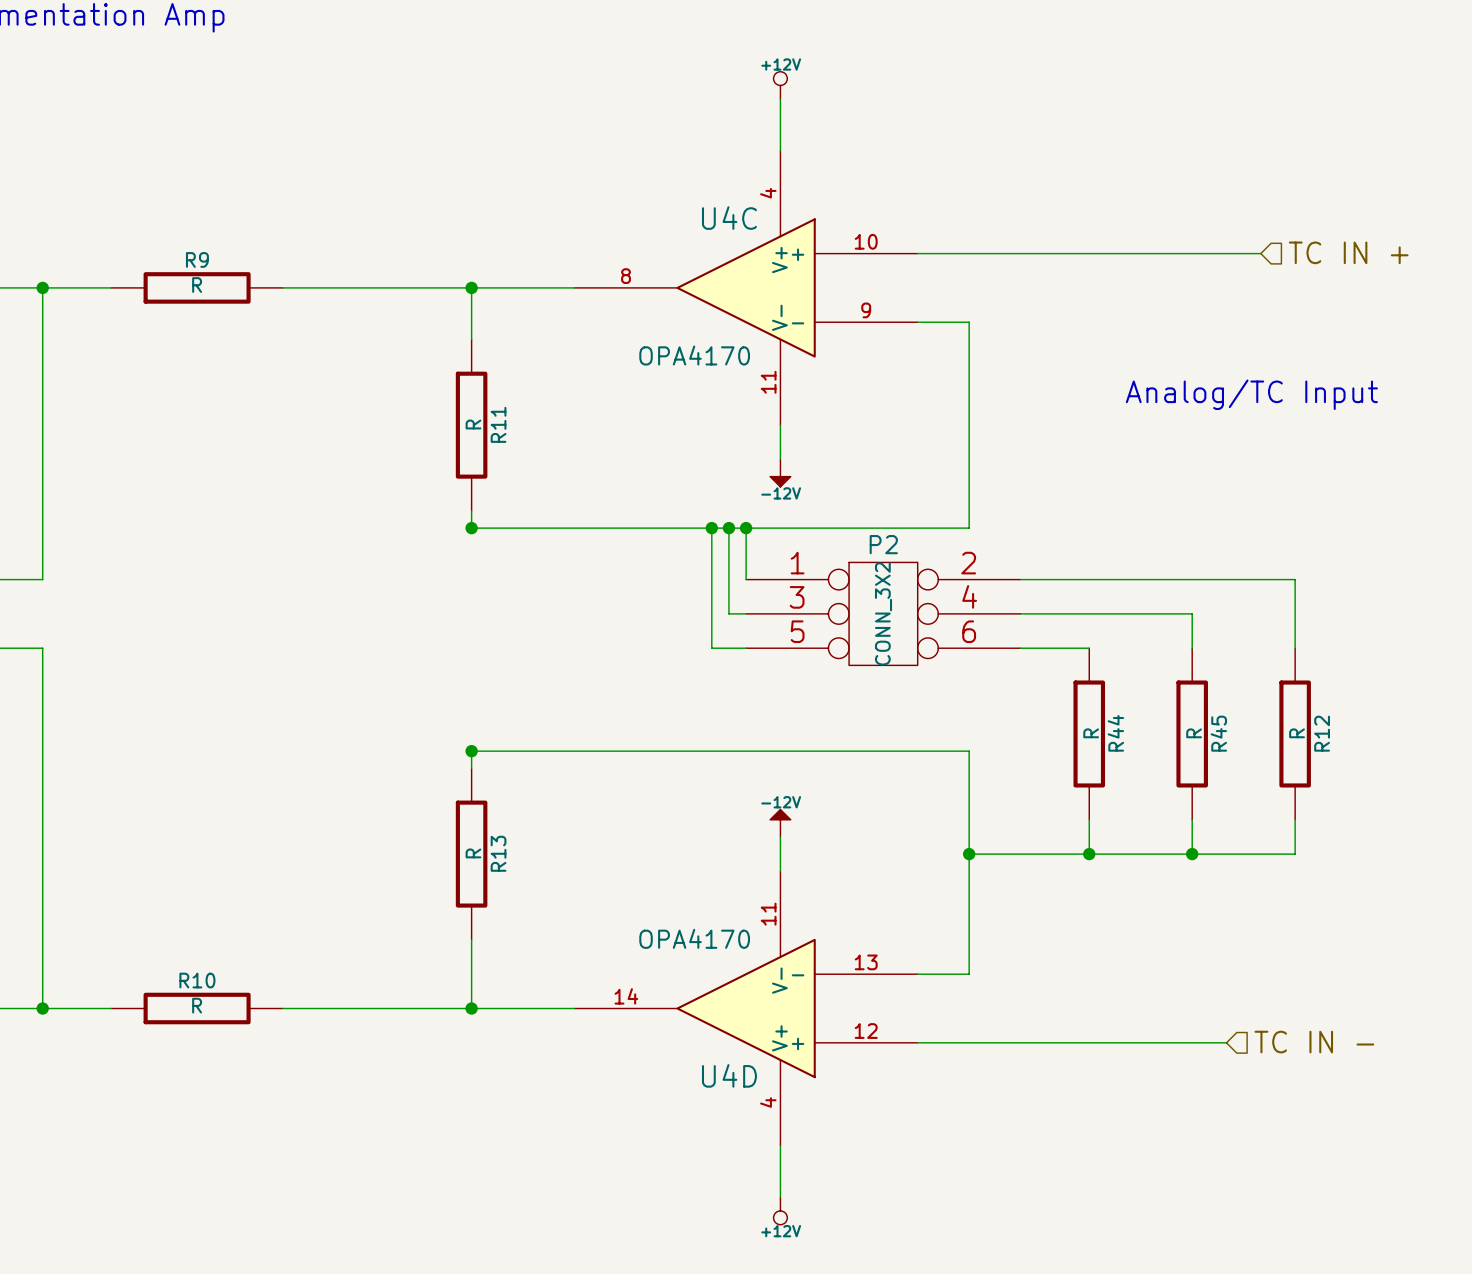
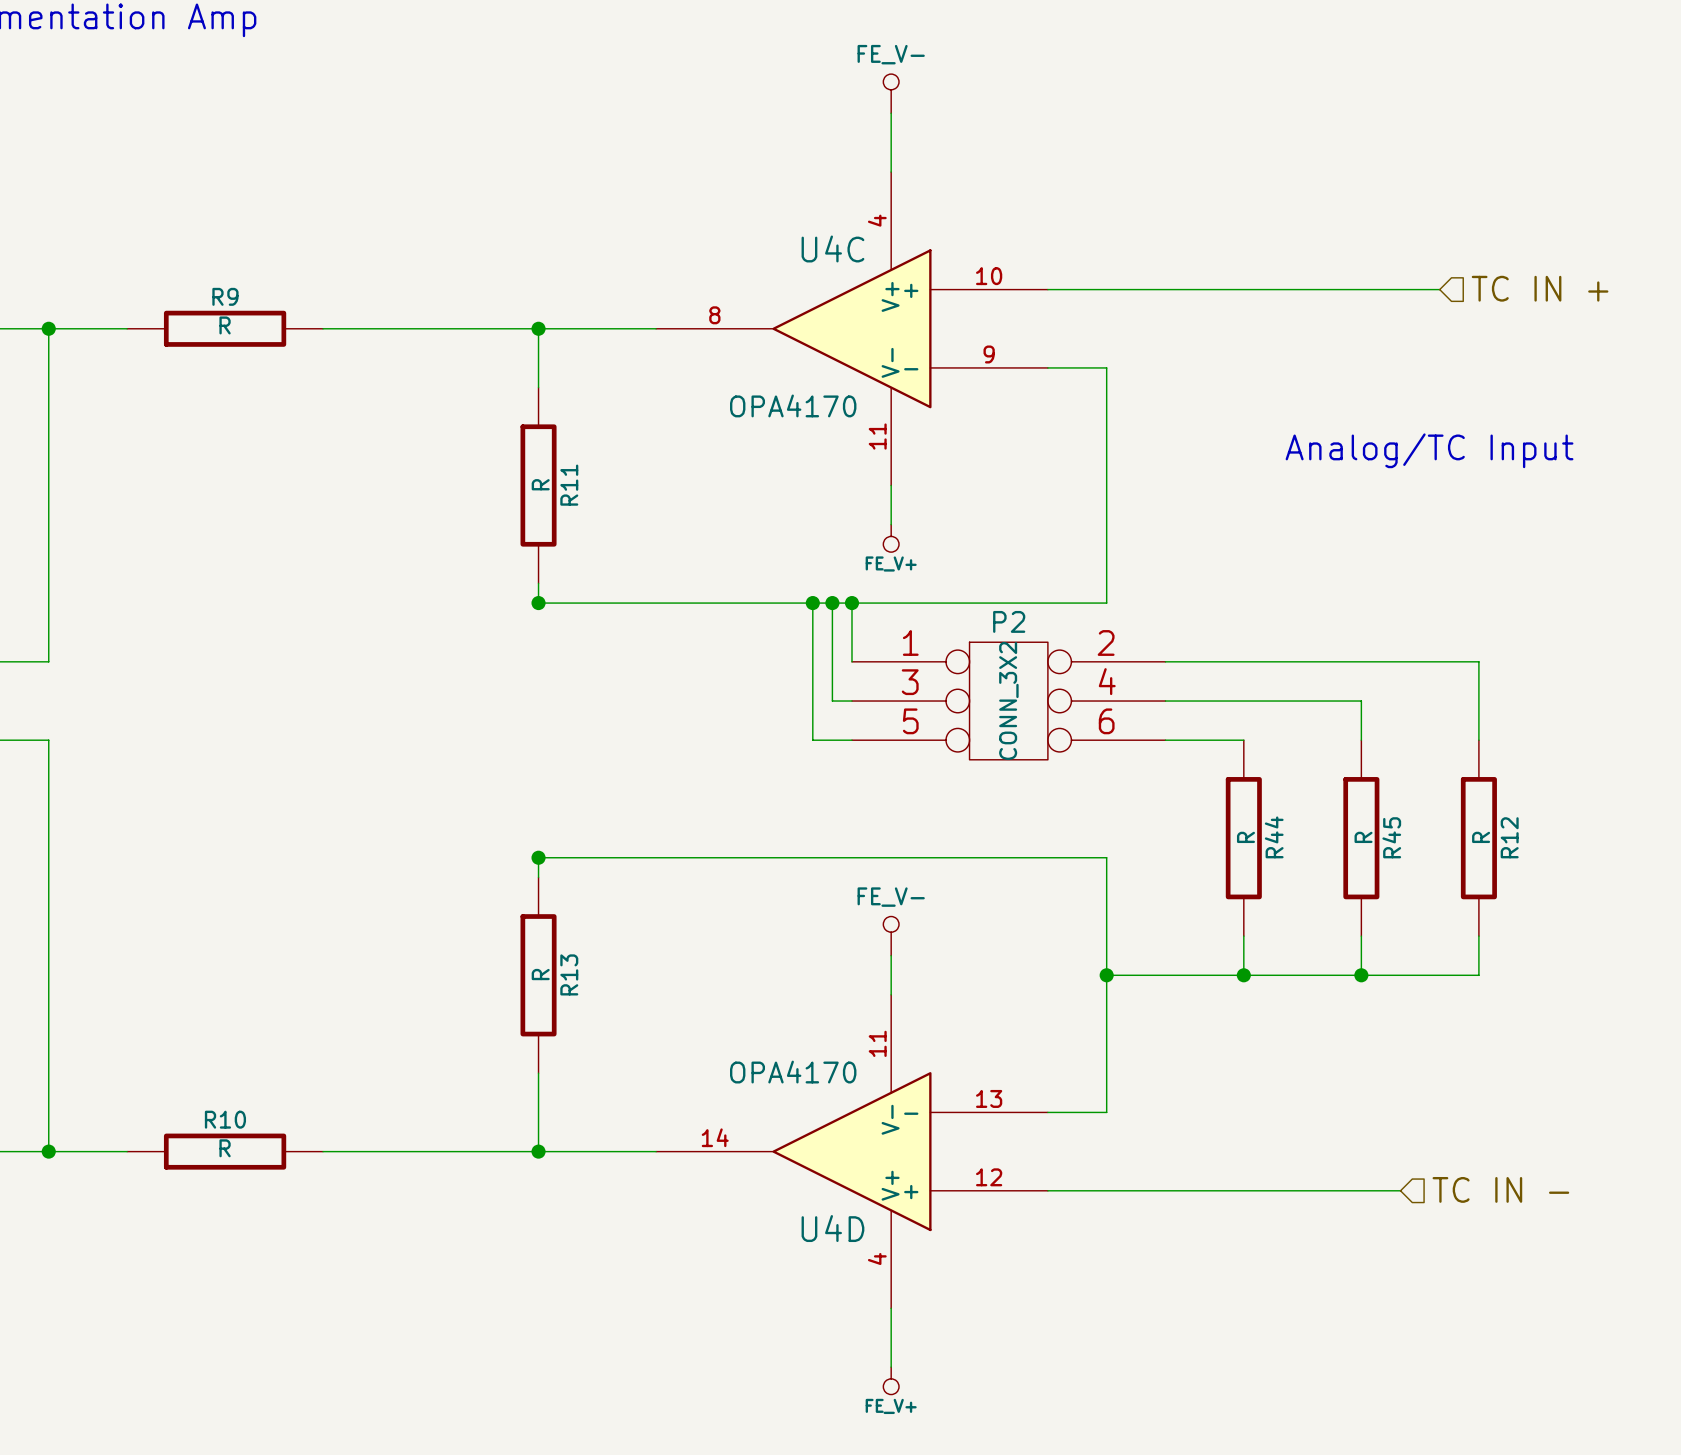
power symbol: +12V (780, 85) -> FE_V- (891, 93)
power symbol: -12V (780, 473) -> FE_V+ (891, 538)
power symbol: -12V (780, 823) -> FE_V- (891, 936)
power symbol: +12V (780, 1210) -> FE_V+ (891, 1380)

